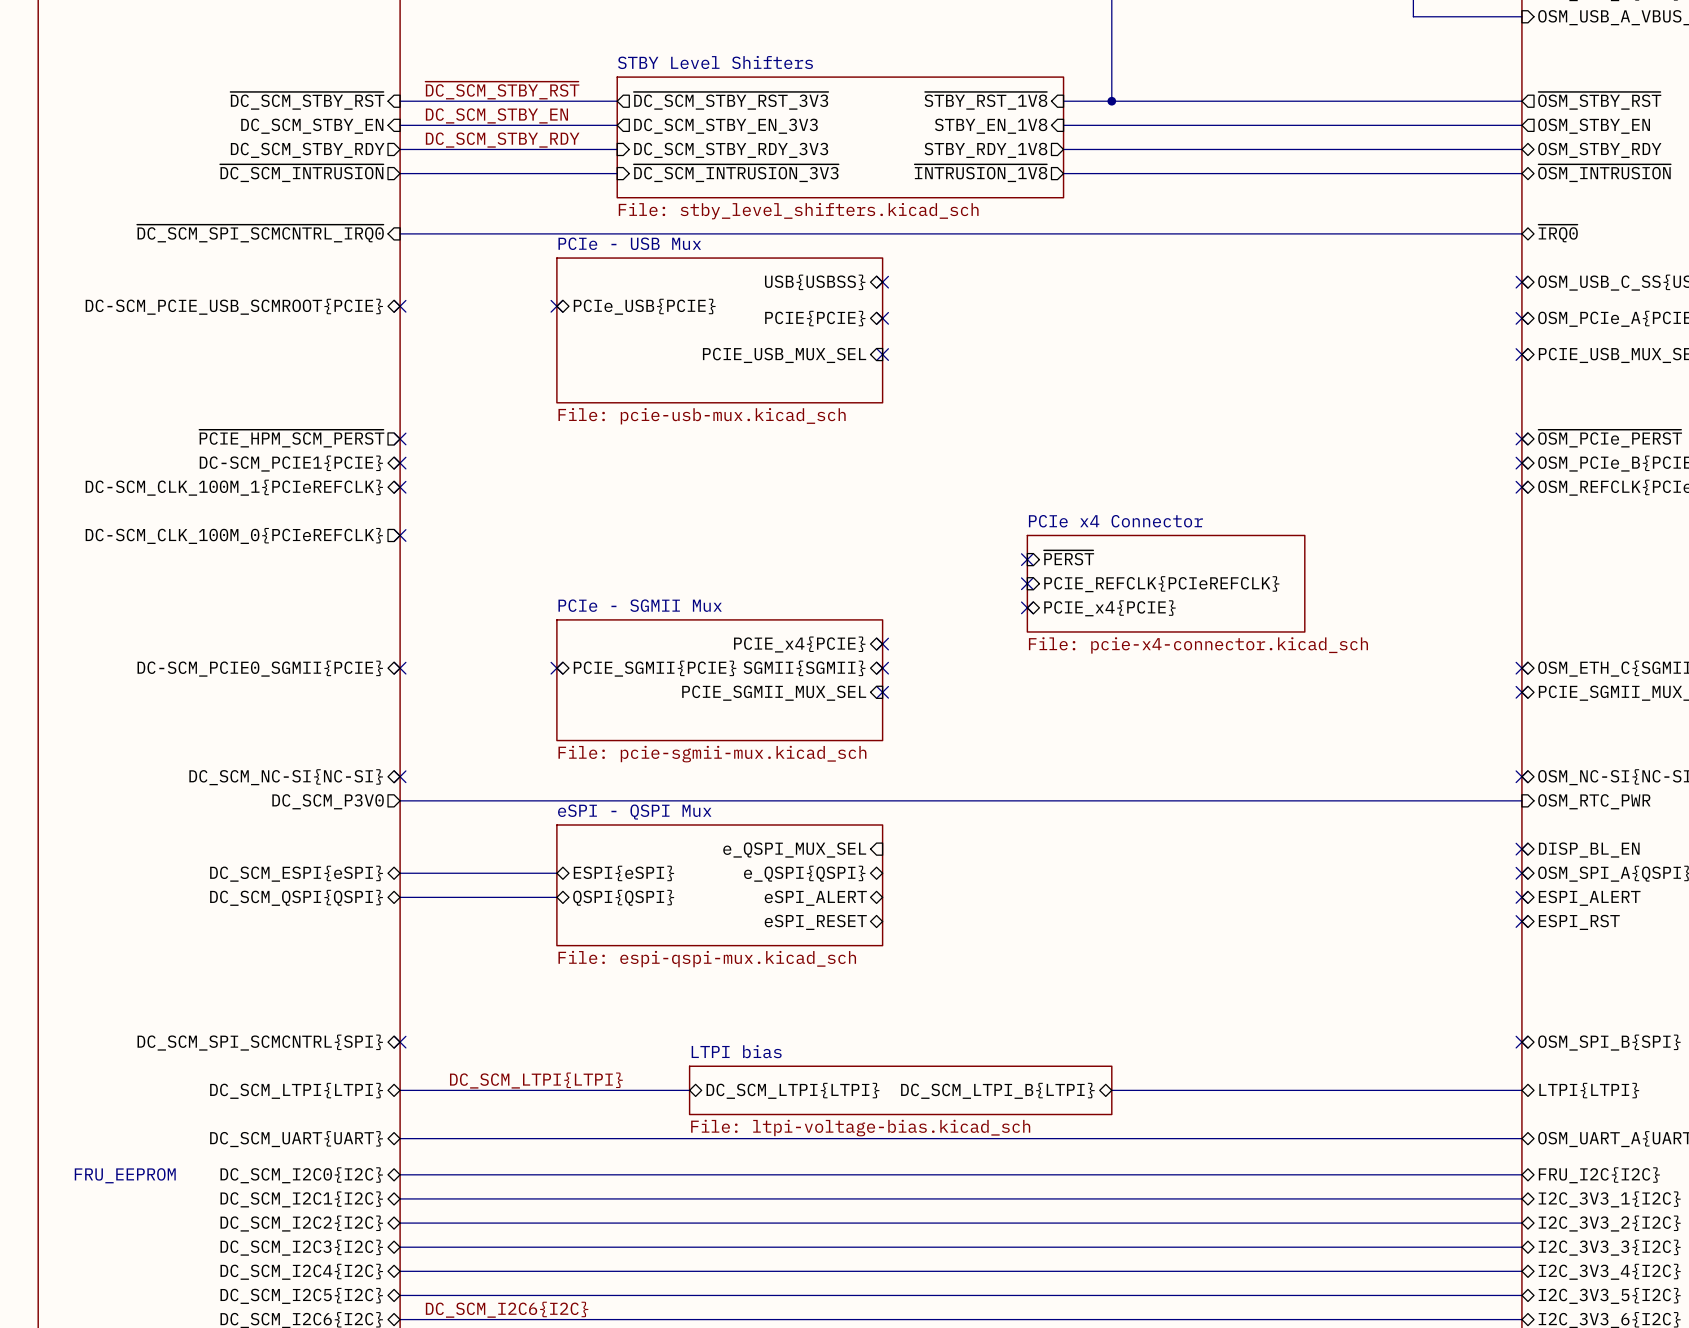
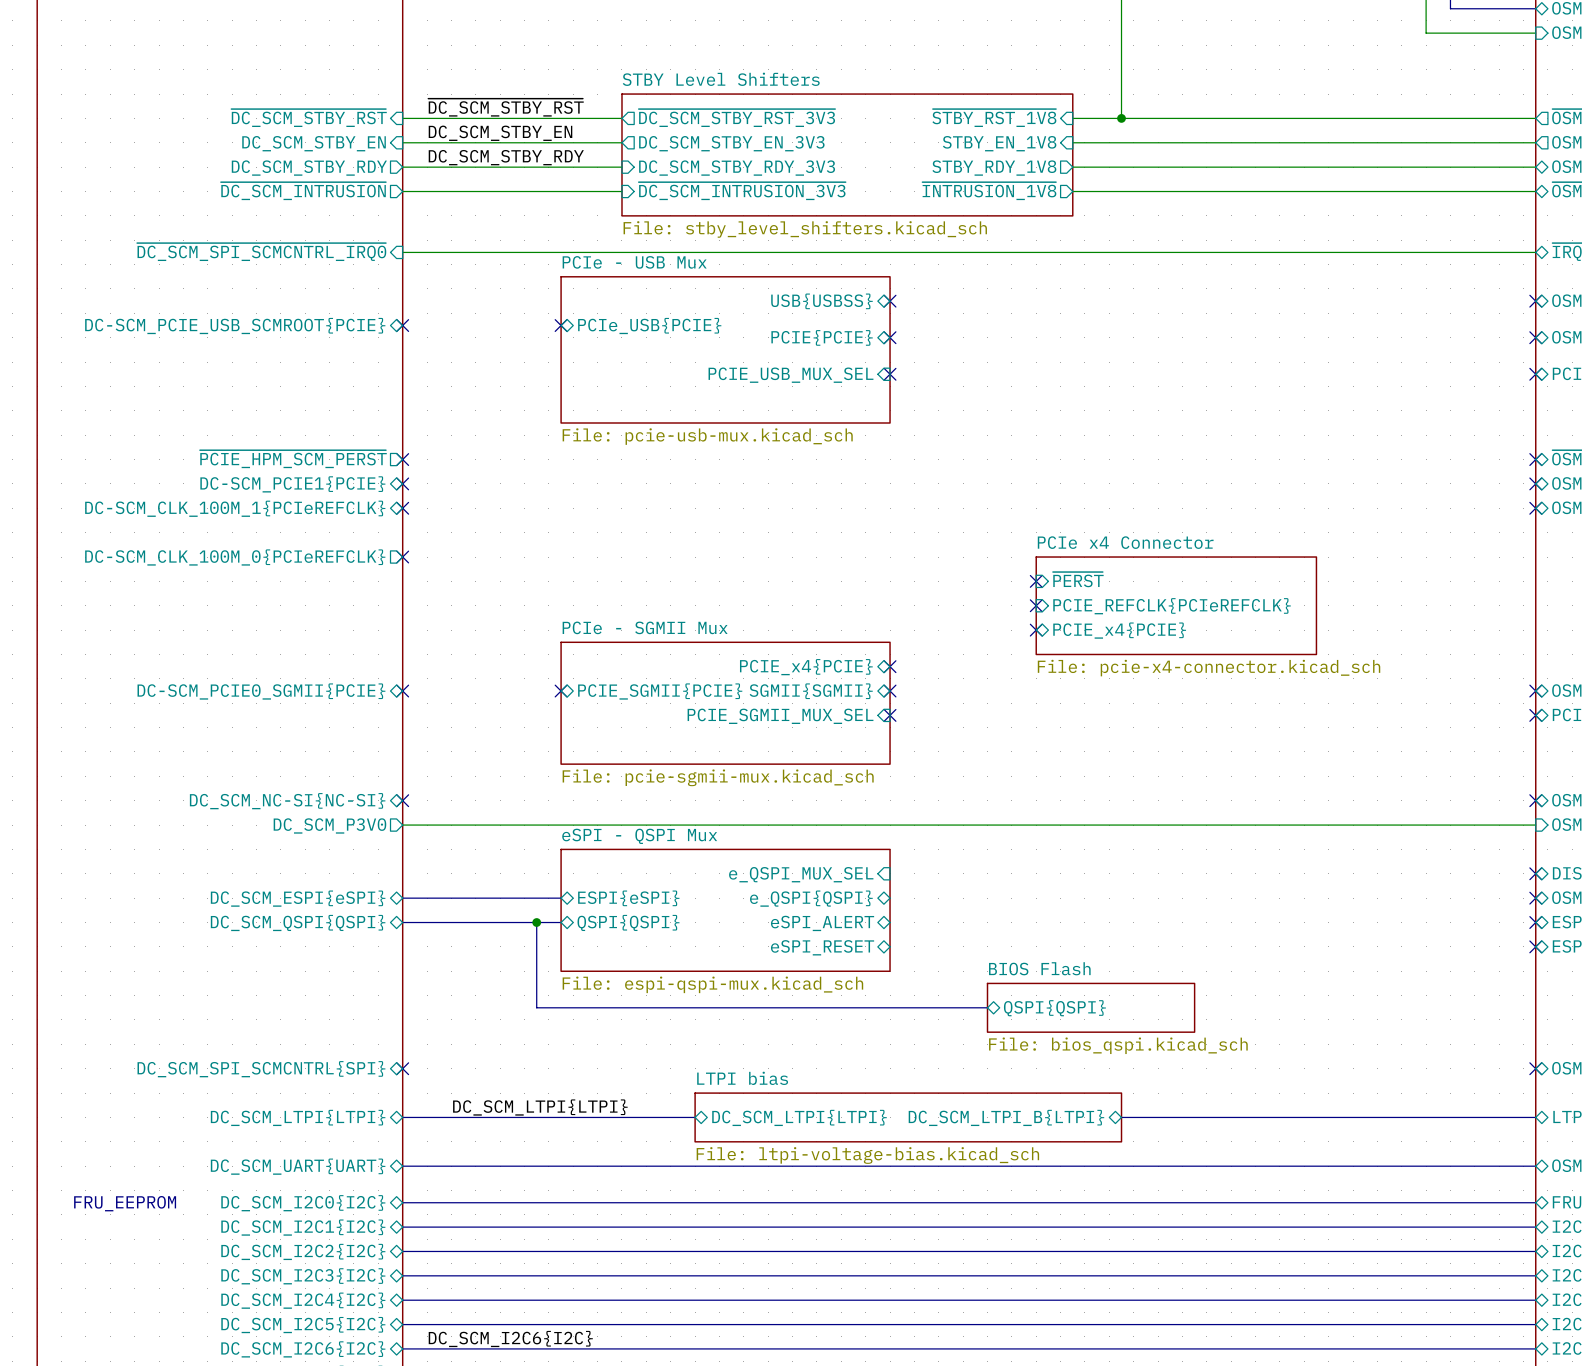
bus: none -> (536, 922) (536, 1007) (987, 1007)
junction: none -> (536, 922)
sheet BIOS Flash: none -> File: bios_qspi.kicad_sch (1091, 1007)
sheet pin: none -> QSPI{QSPI} (1054, 1008)

